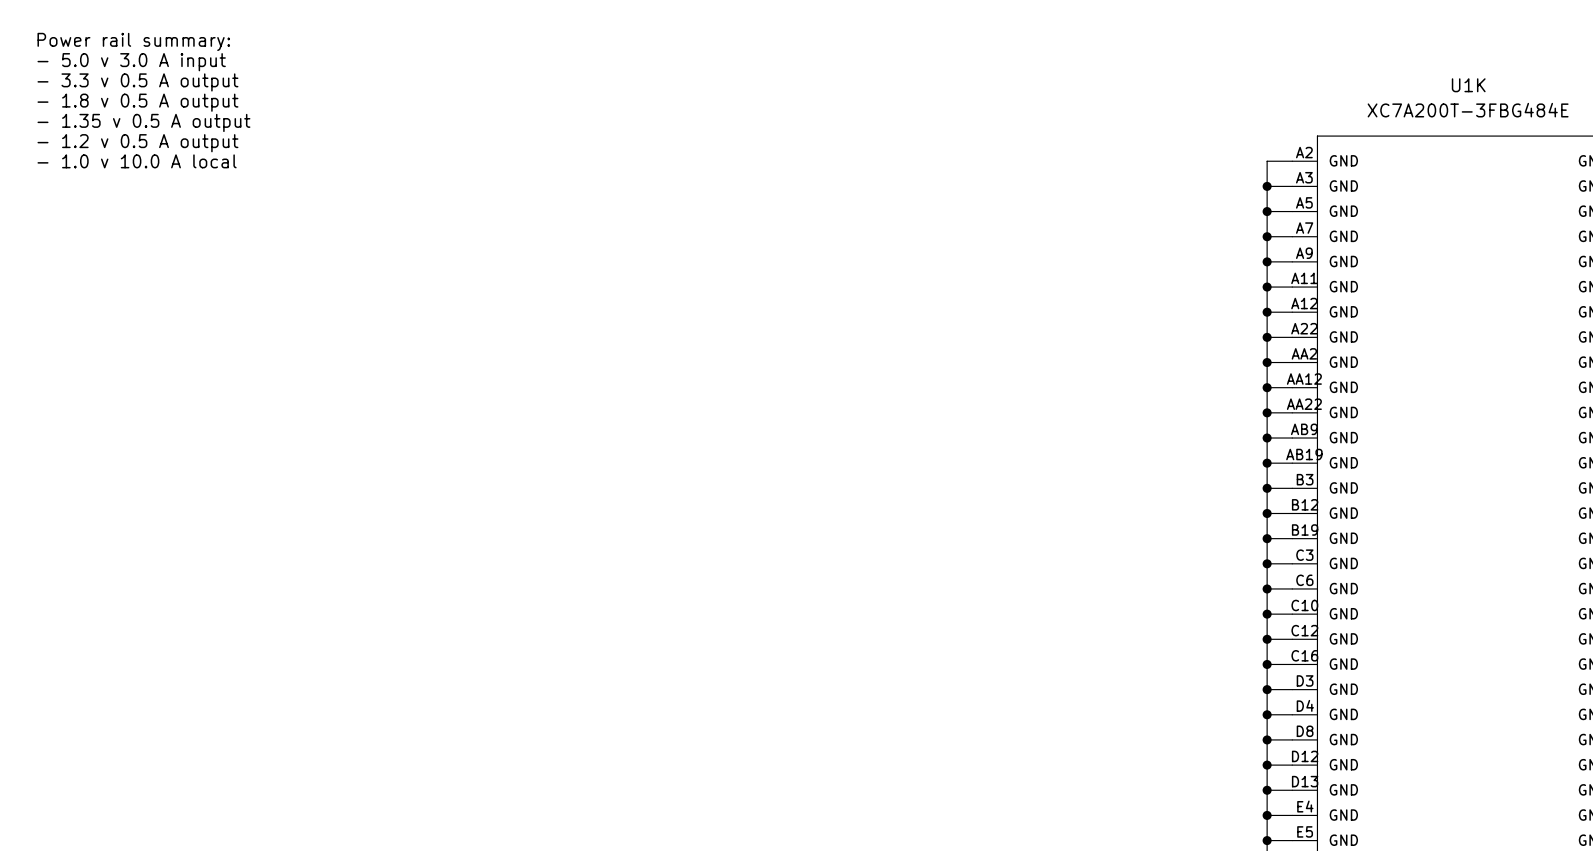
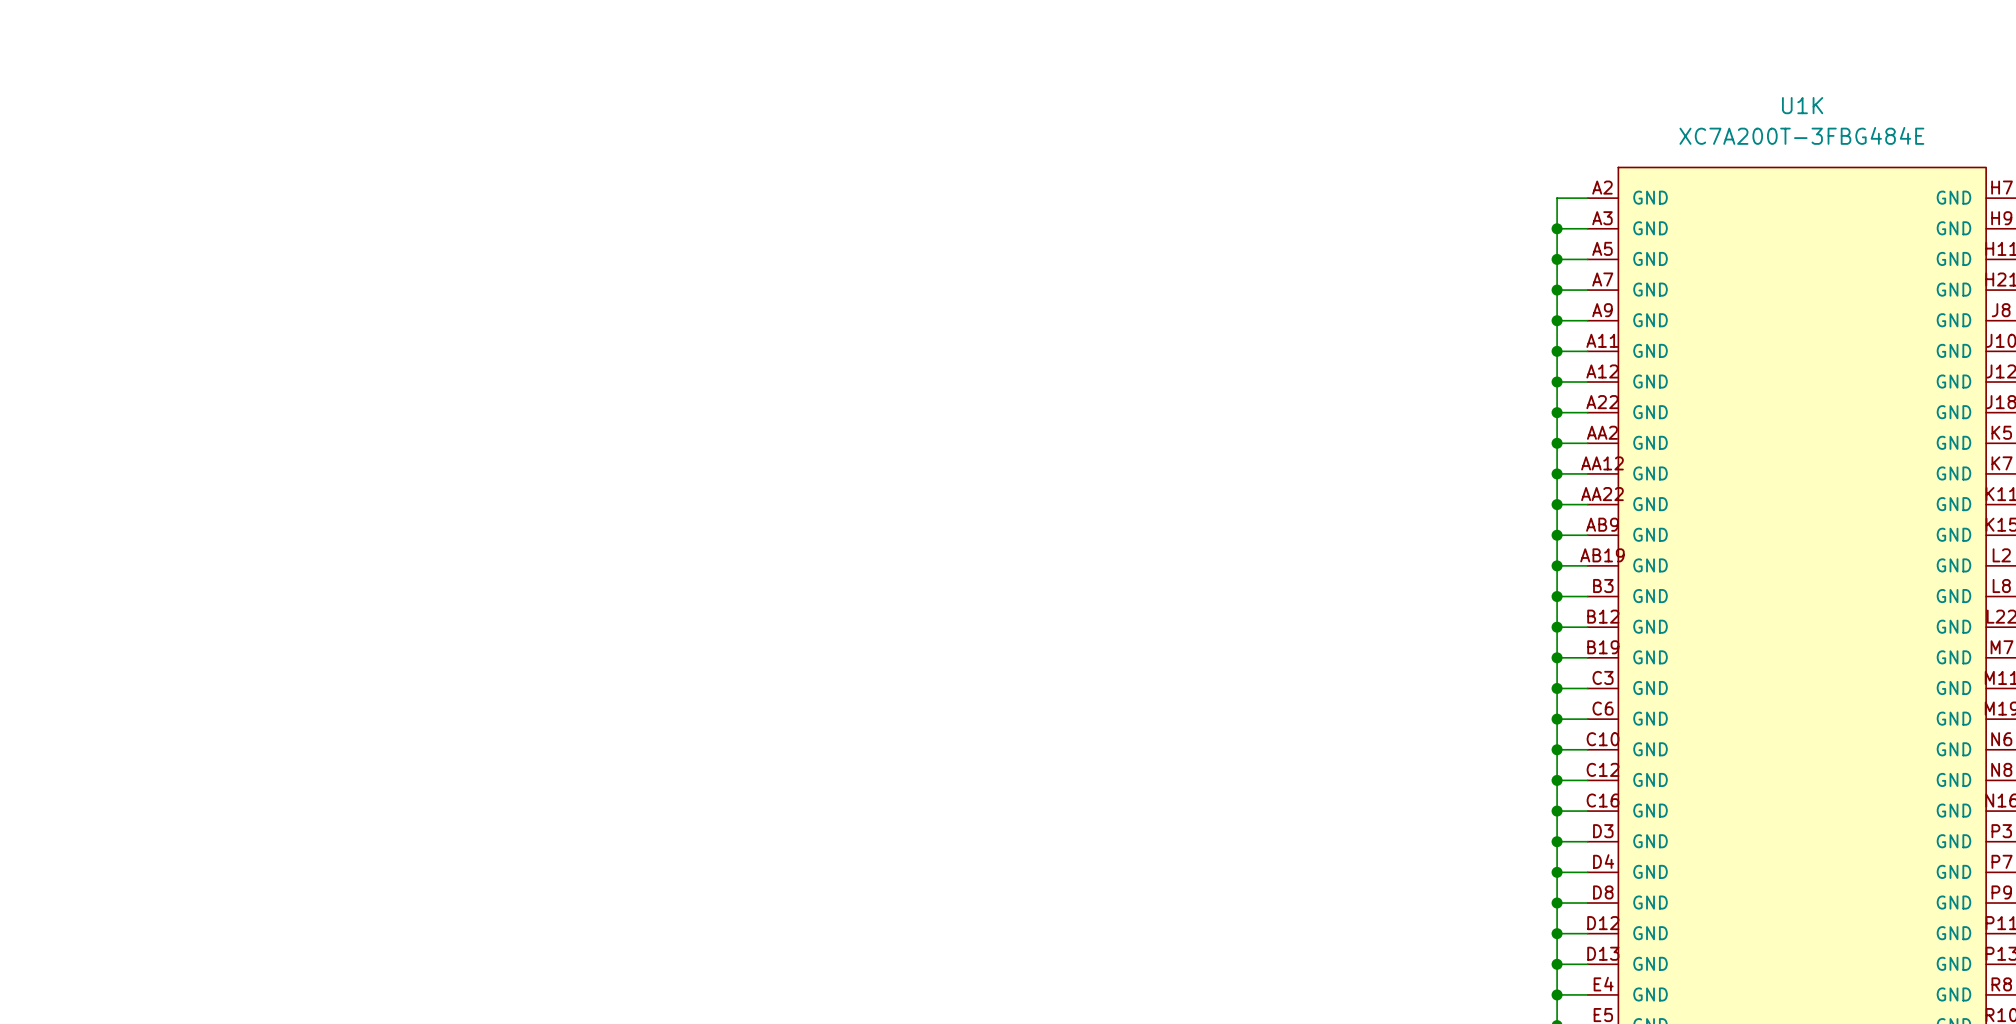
text: Power rail summary: (133, 41) -> none
text: - 5.0 v 3.0 A input (131, 62) -> none
text: - 3.3 v 0.5 A output (137, 82) -> none
text: - 1.8 v 0.5 A output (137, 102) -> none
text: - 1.35 v 0.5 A output (143, 122) -> none
text: - 1.2 v 0.5 A output (137, 143) -> none
text: - 1.0 v 10.0 A local (137, 161) -> none

